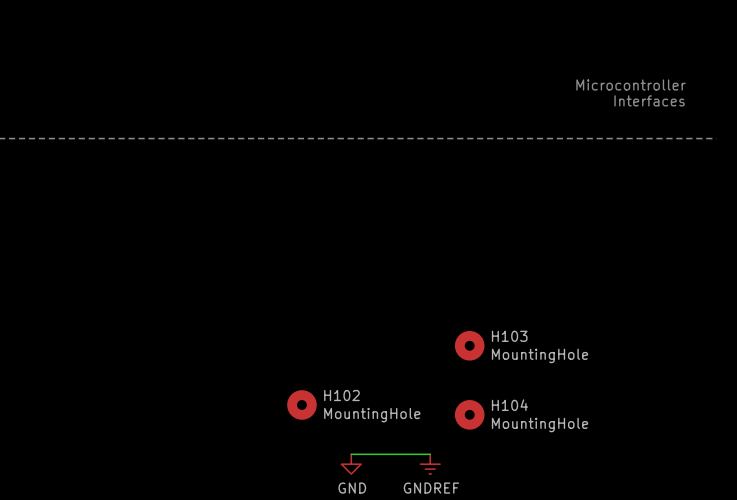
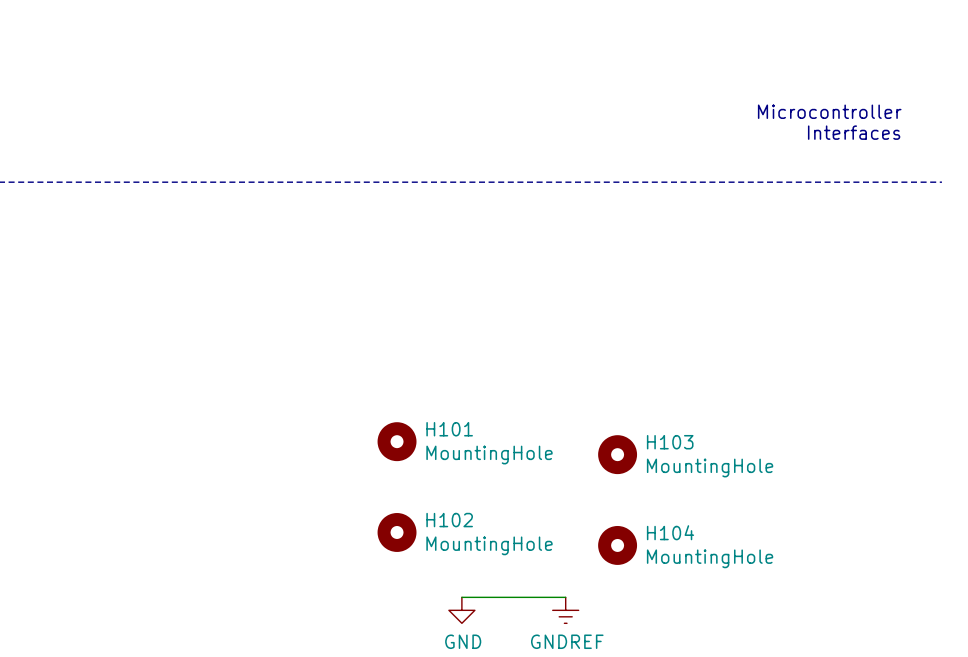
H101: none -> MountingHole (397, 441)

